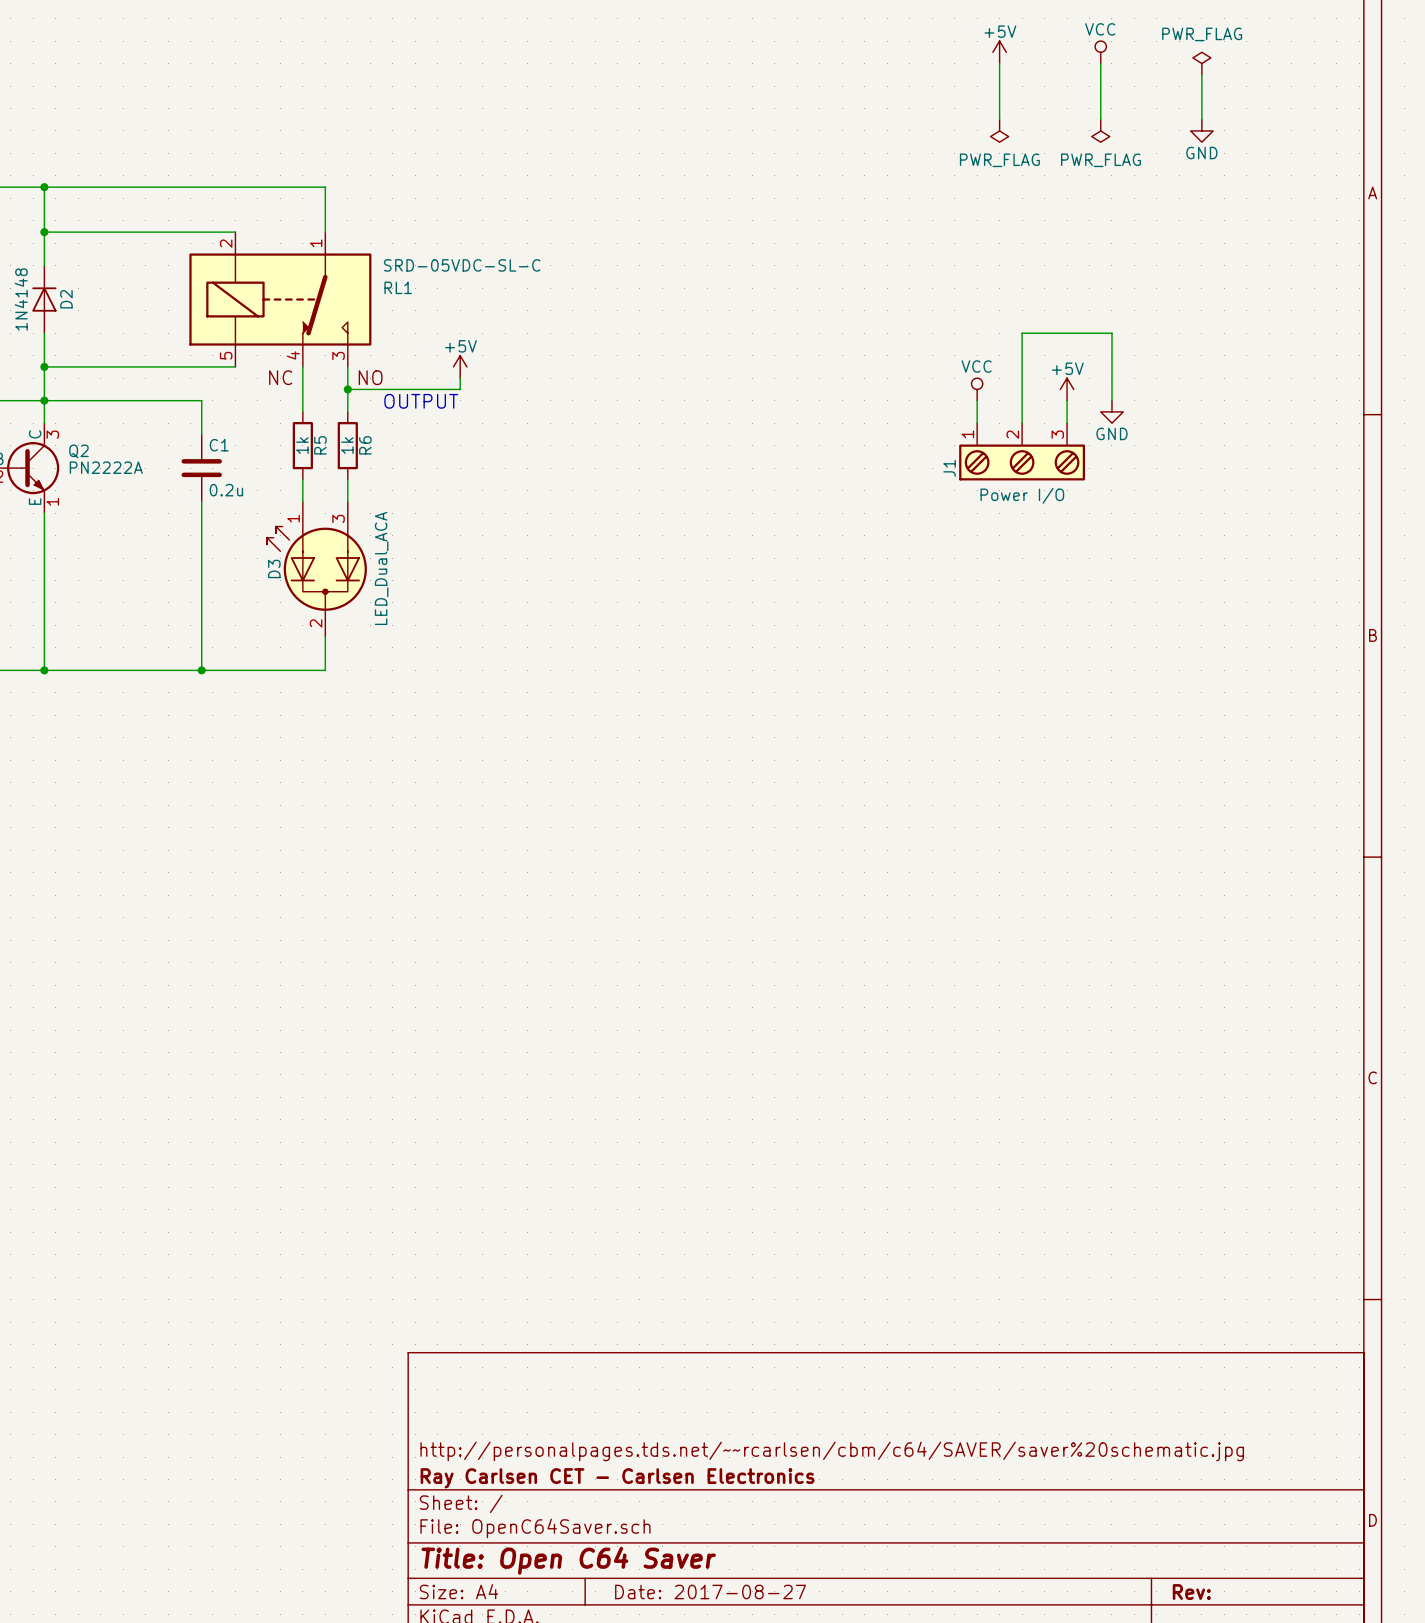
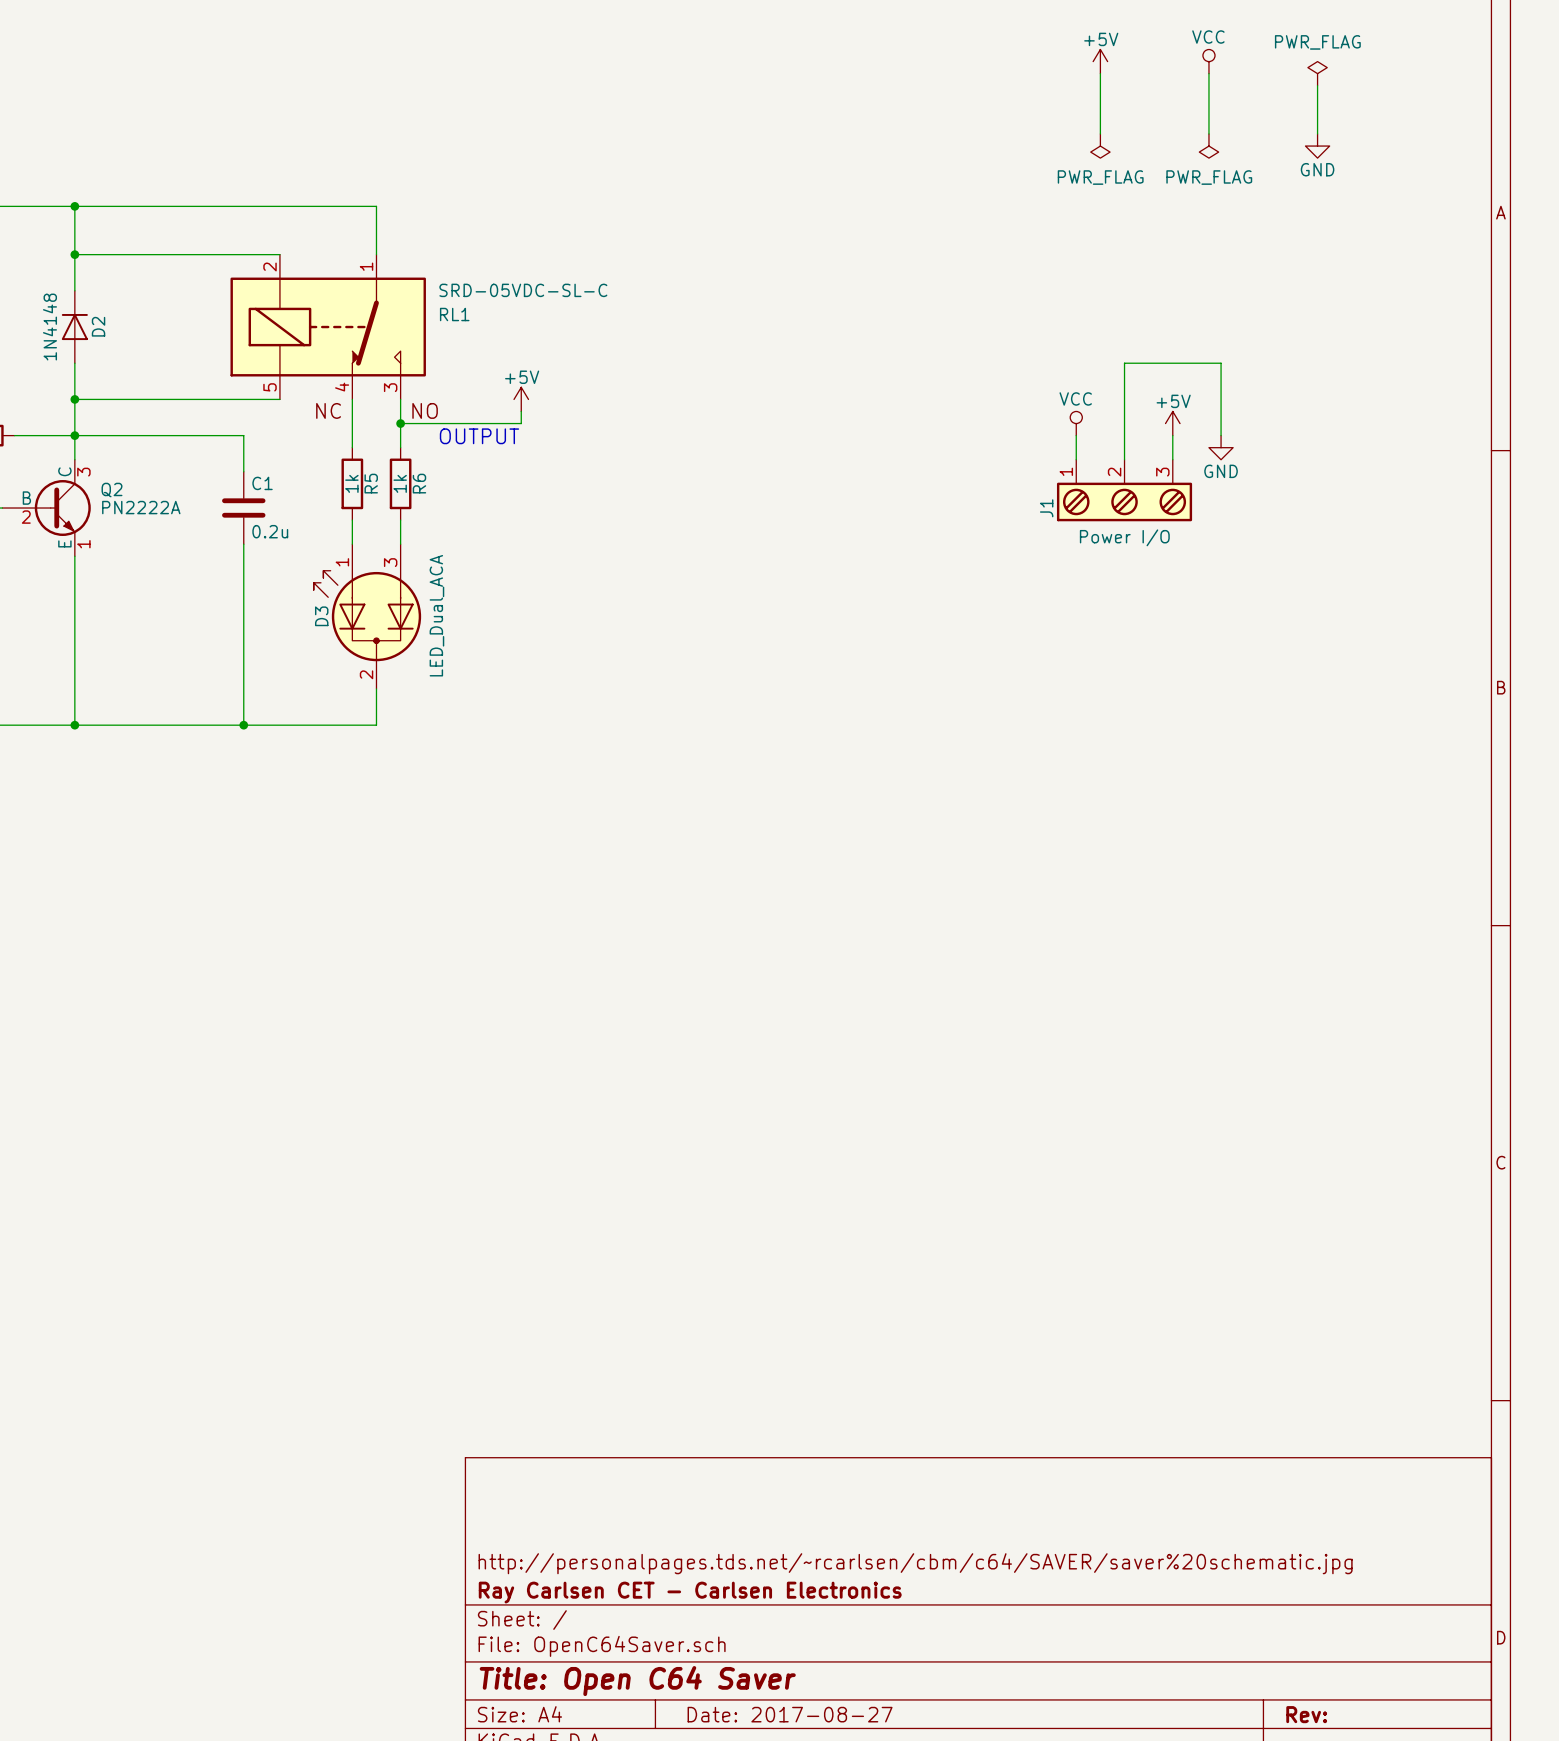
title block: http://personalpages.tds.net/~~rcarlsen/cbm/c64/SAVER/saver%20schematic.jpg (832, 1451) -> http://personalpages.tds.net/~rcarlsen/cbm/c64/SAVER/saver%20schematic.jpg (915, 1563)

